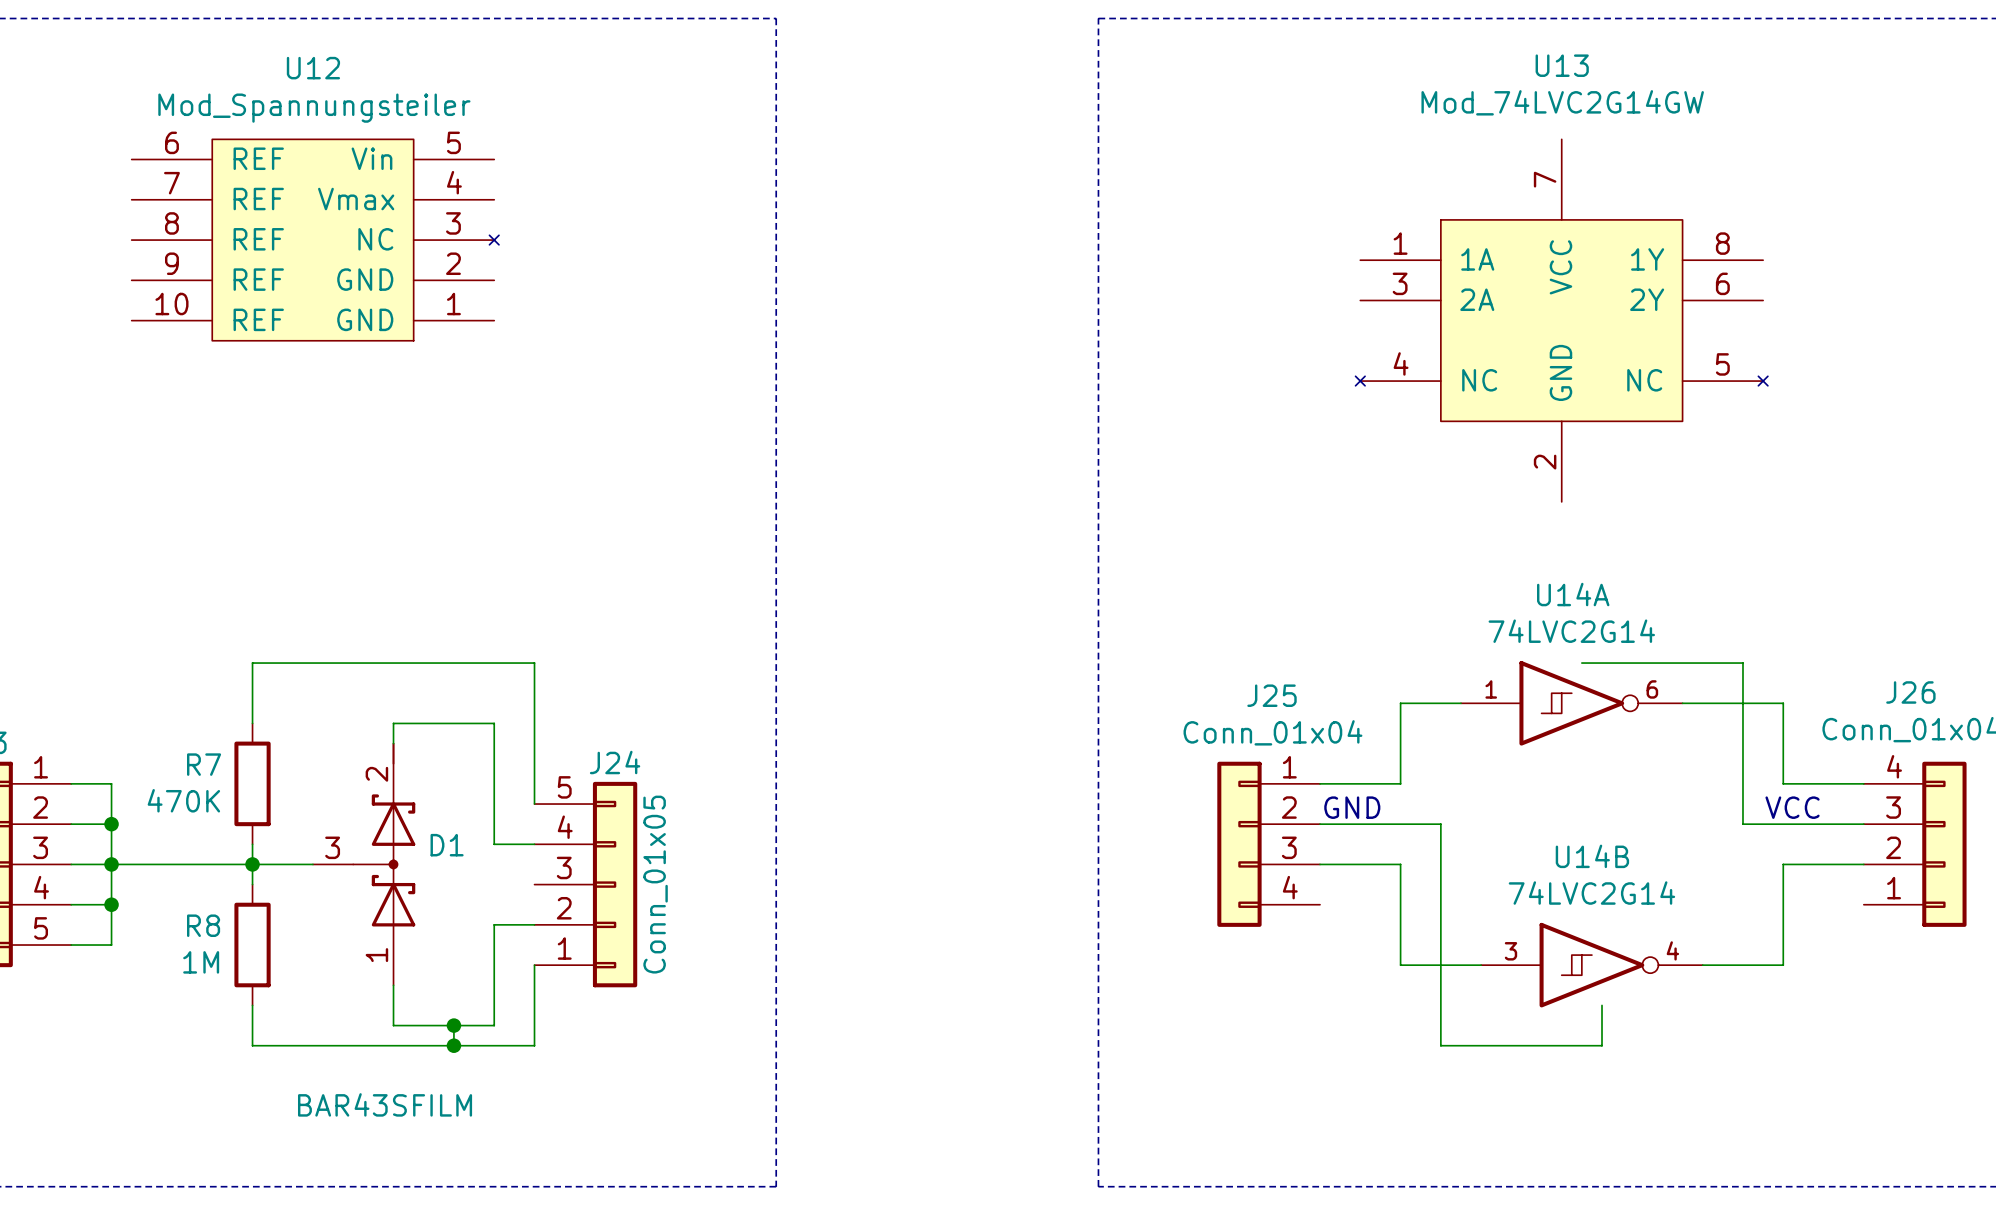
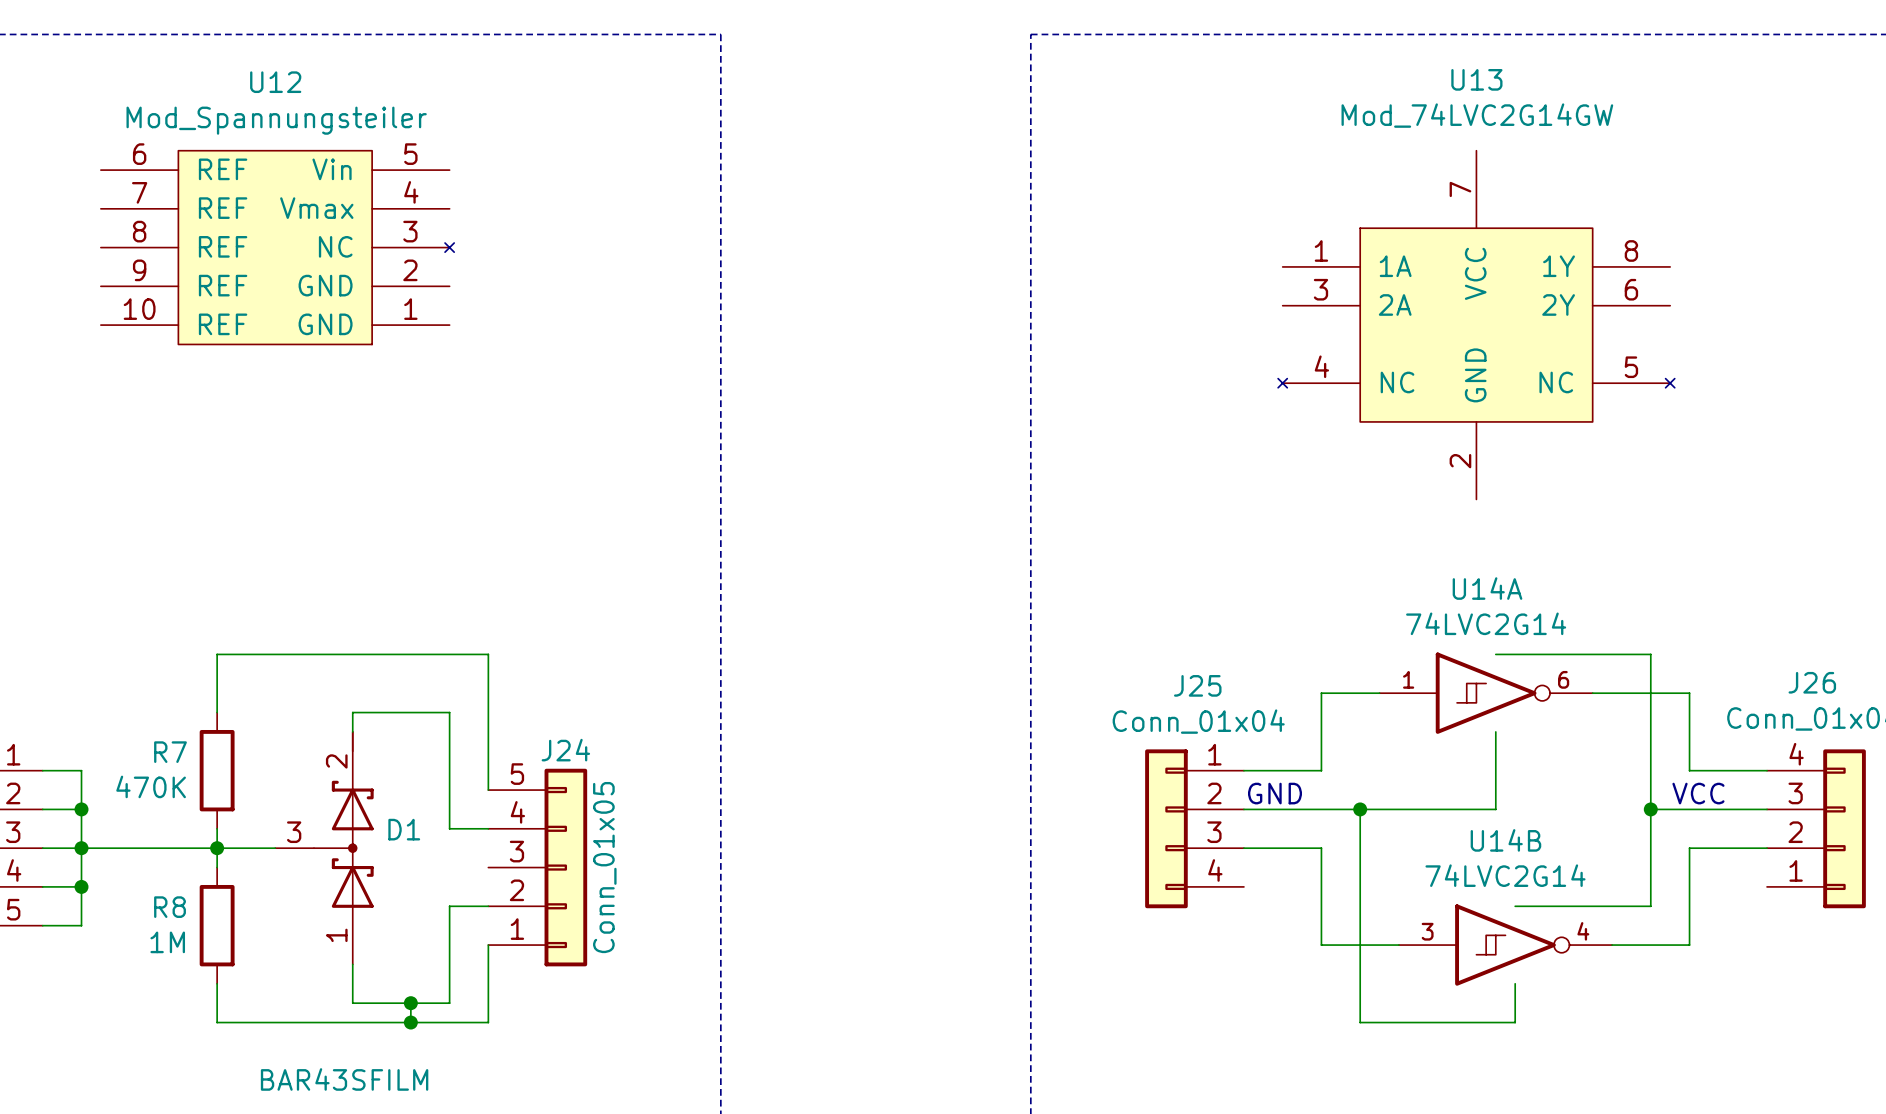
wire: none -> (1495, 731) (1495, 809) (1360, 809)
junction: none -> (1360, 809)
wire: none -> (1650, 809) (1650, 906) (1515, 906)
junction: none -> (1650, 809)

